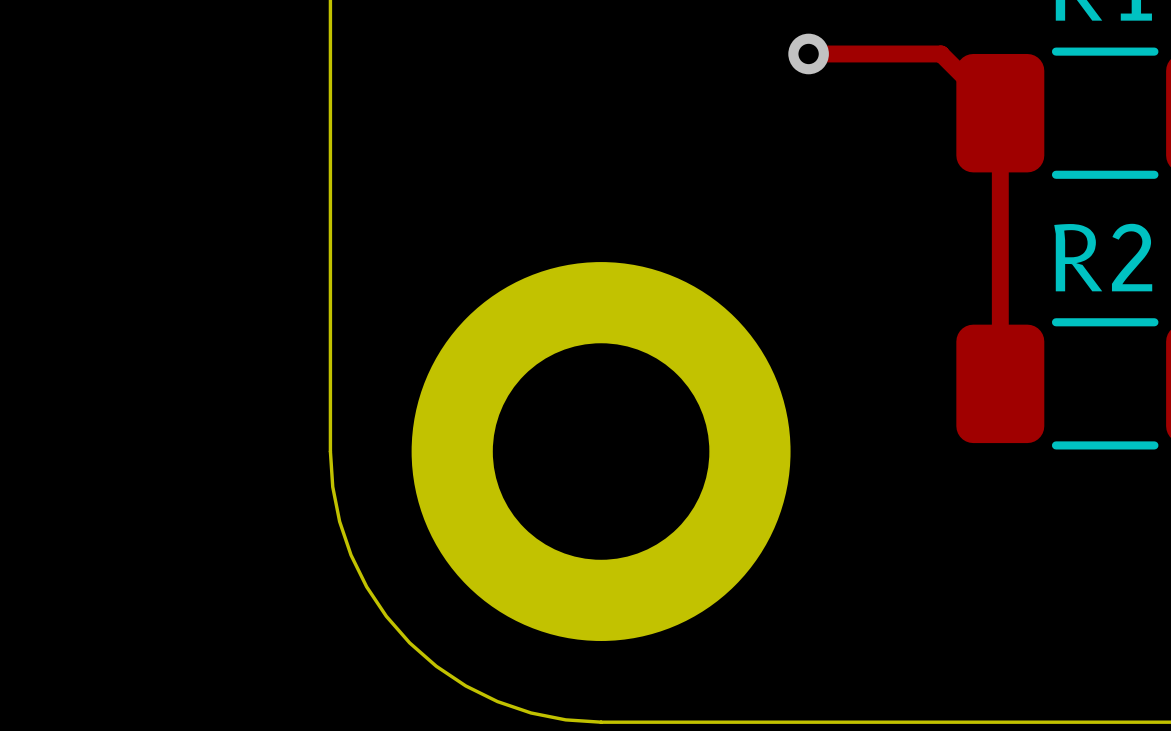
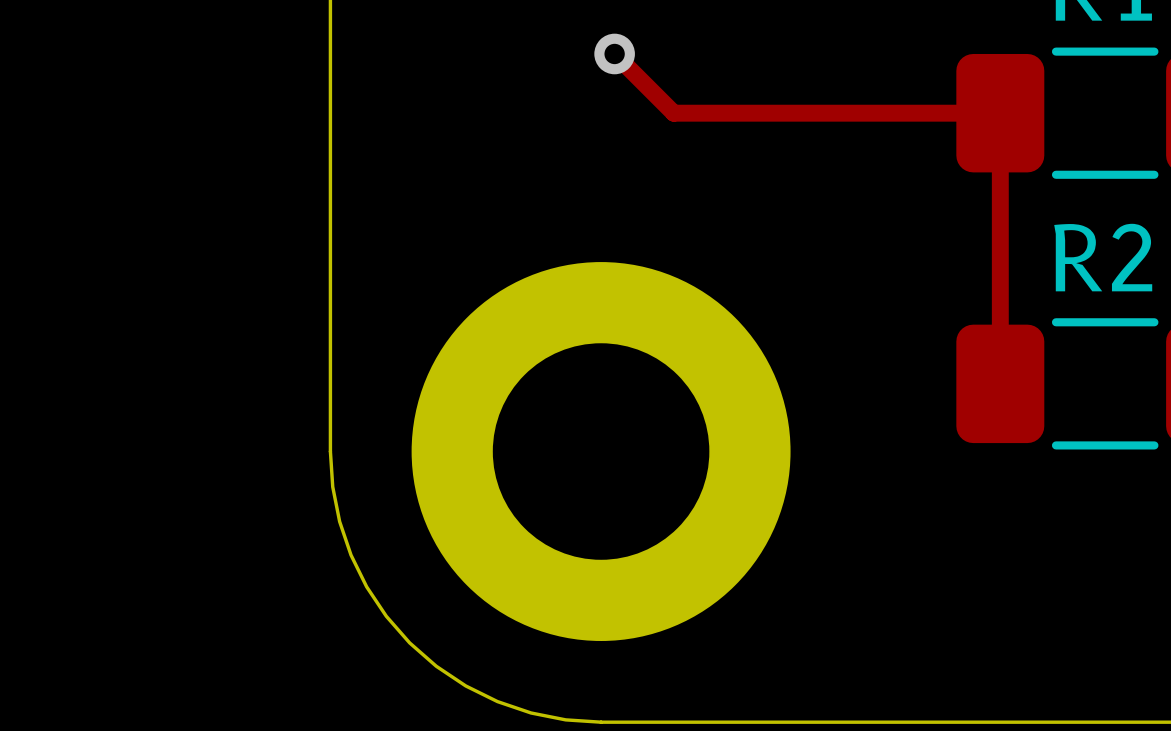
track: (808, 53) (941, 53) (1000, 113) -> (614, 53) (673, 113) (1000, 113)
via position: (808, 53) -> (614, 53)

